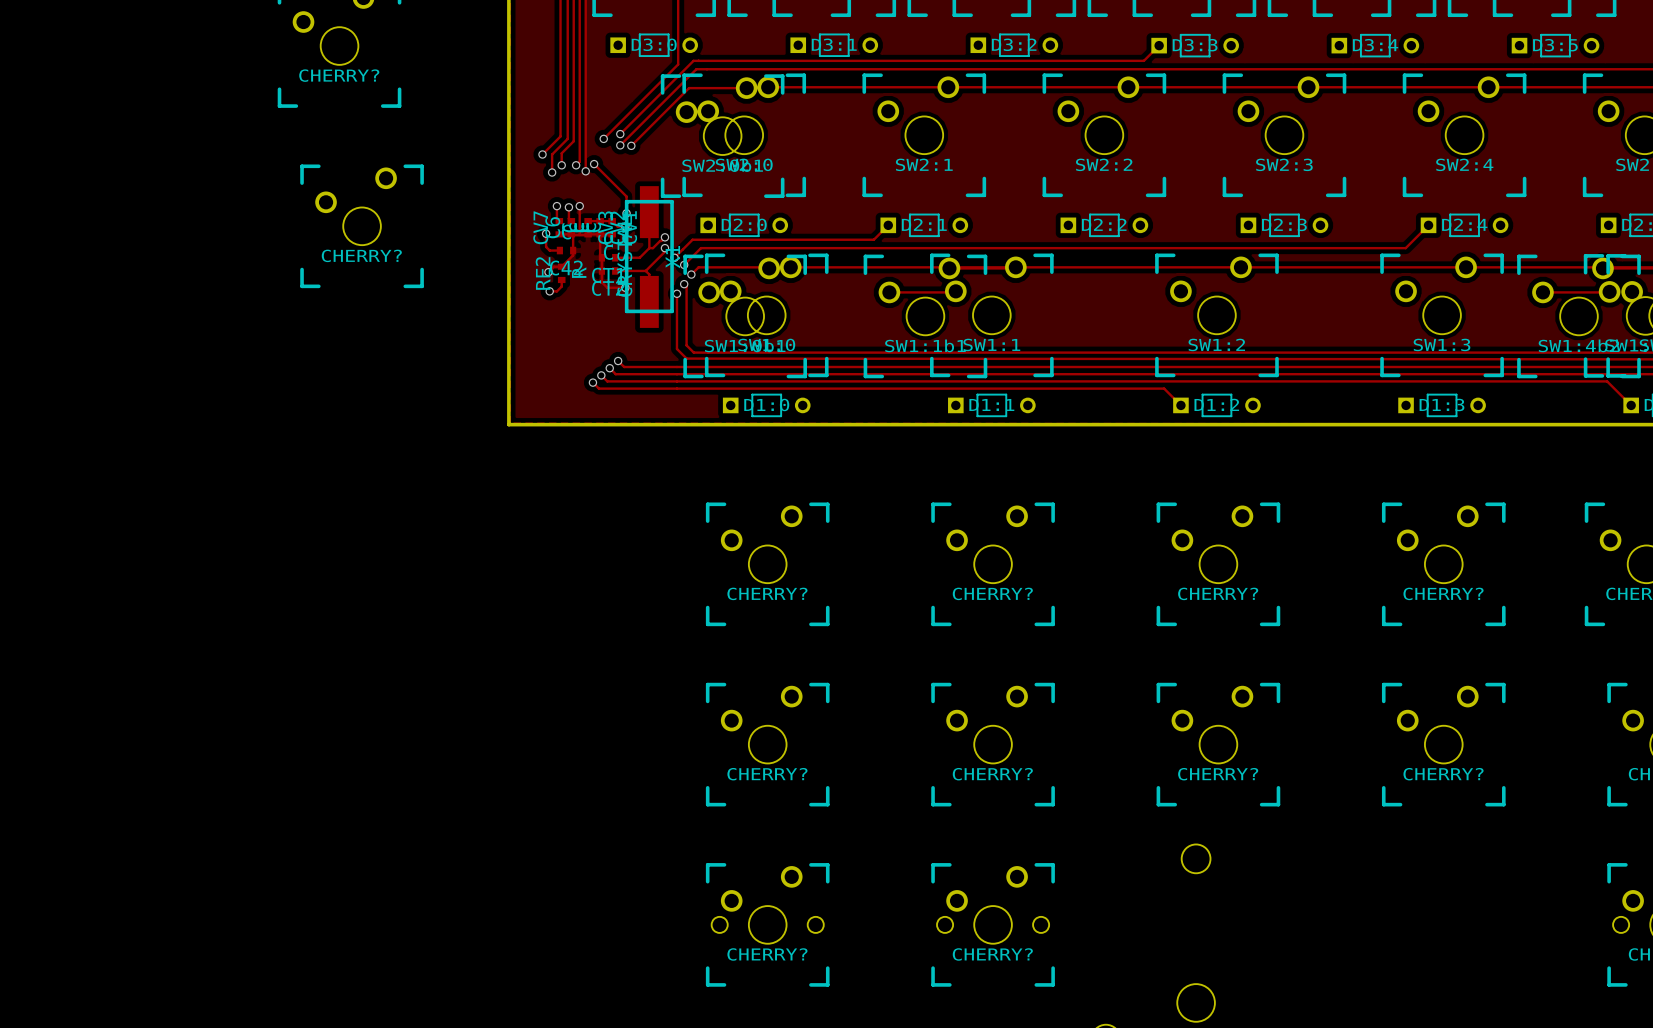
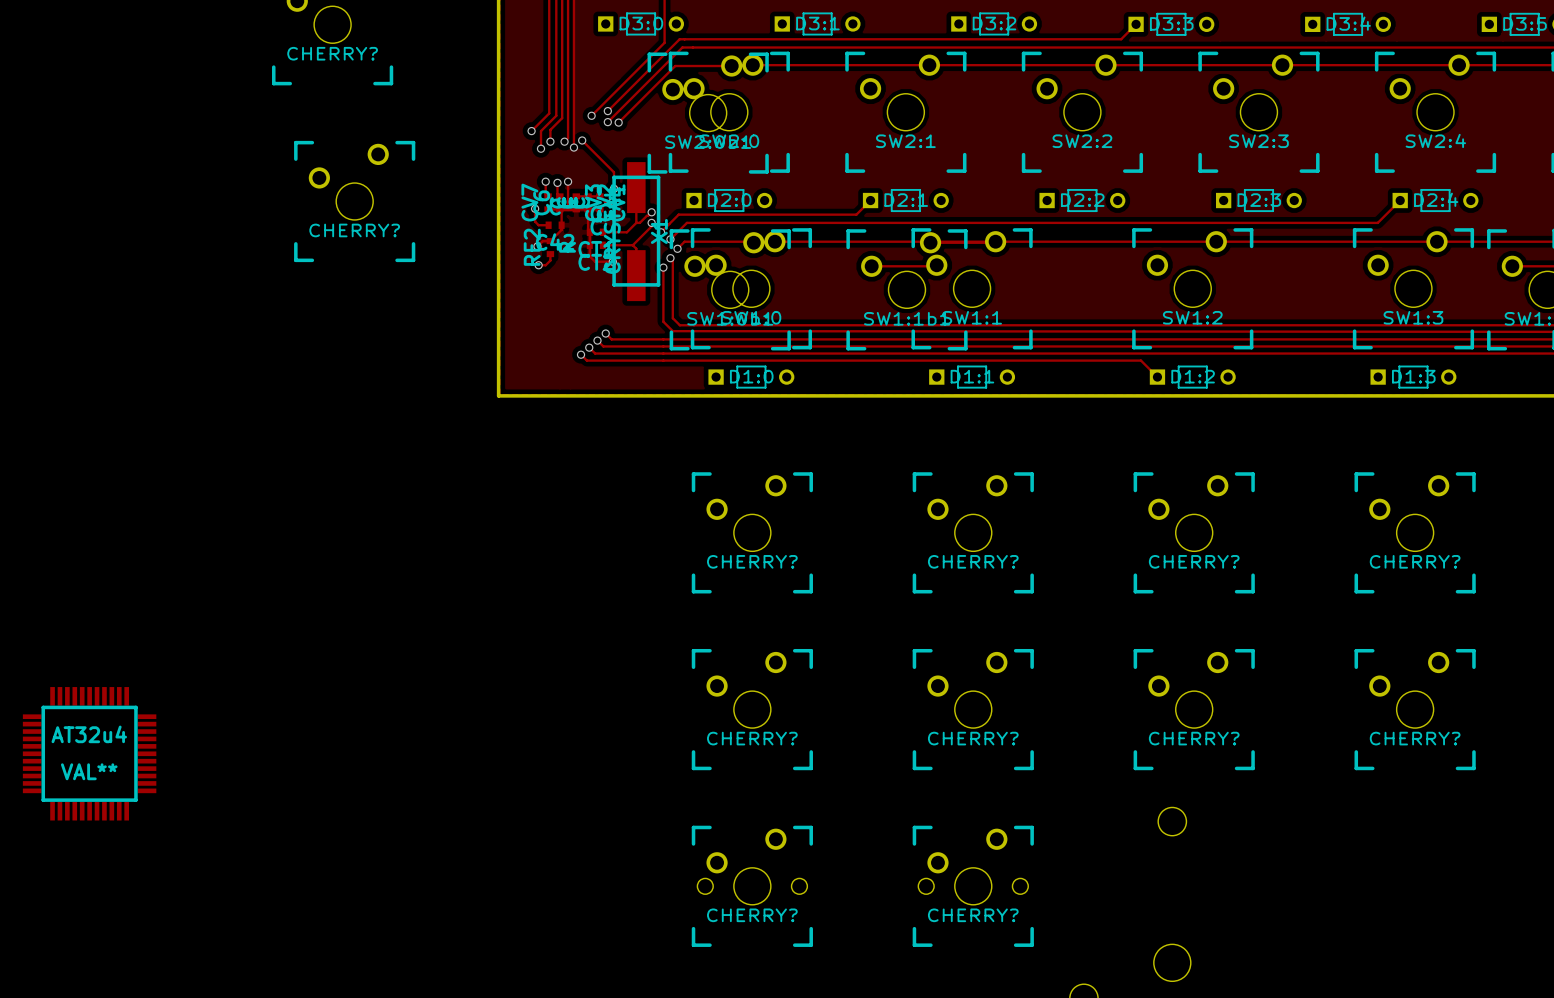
AT32u4: none -> VAL** (89, 753)

